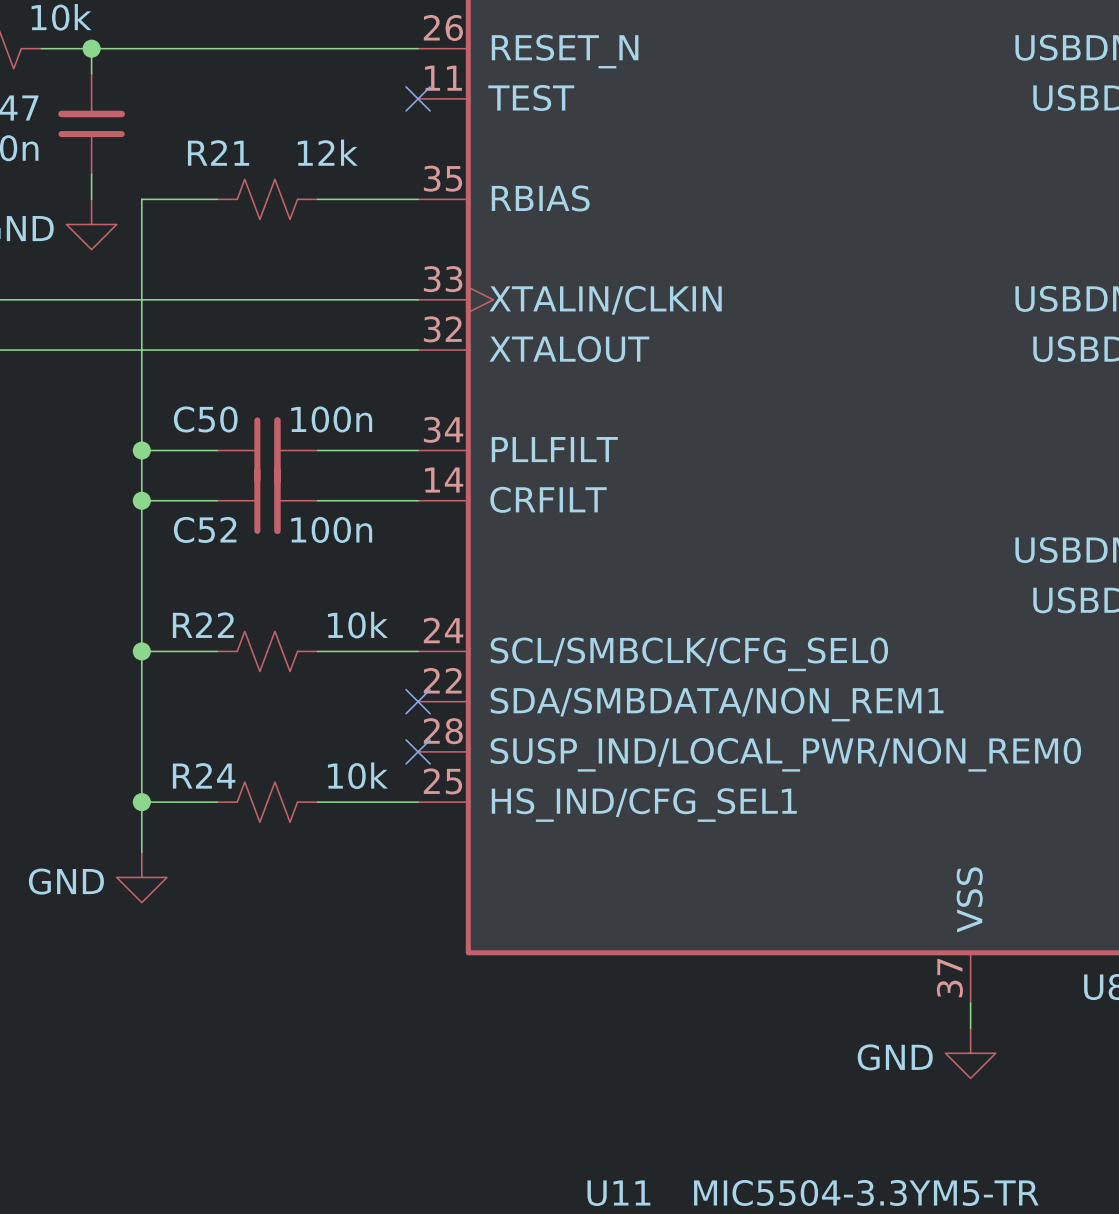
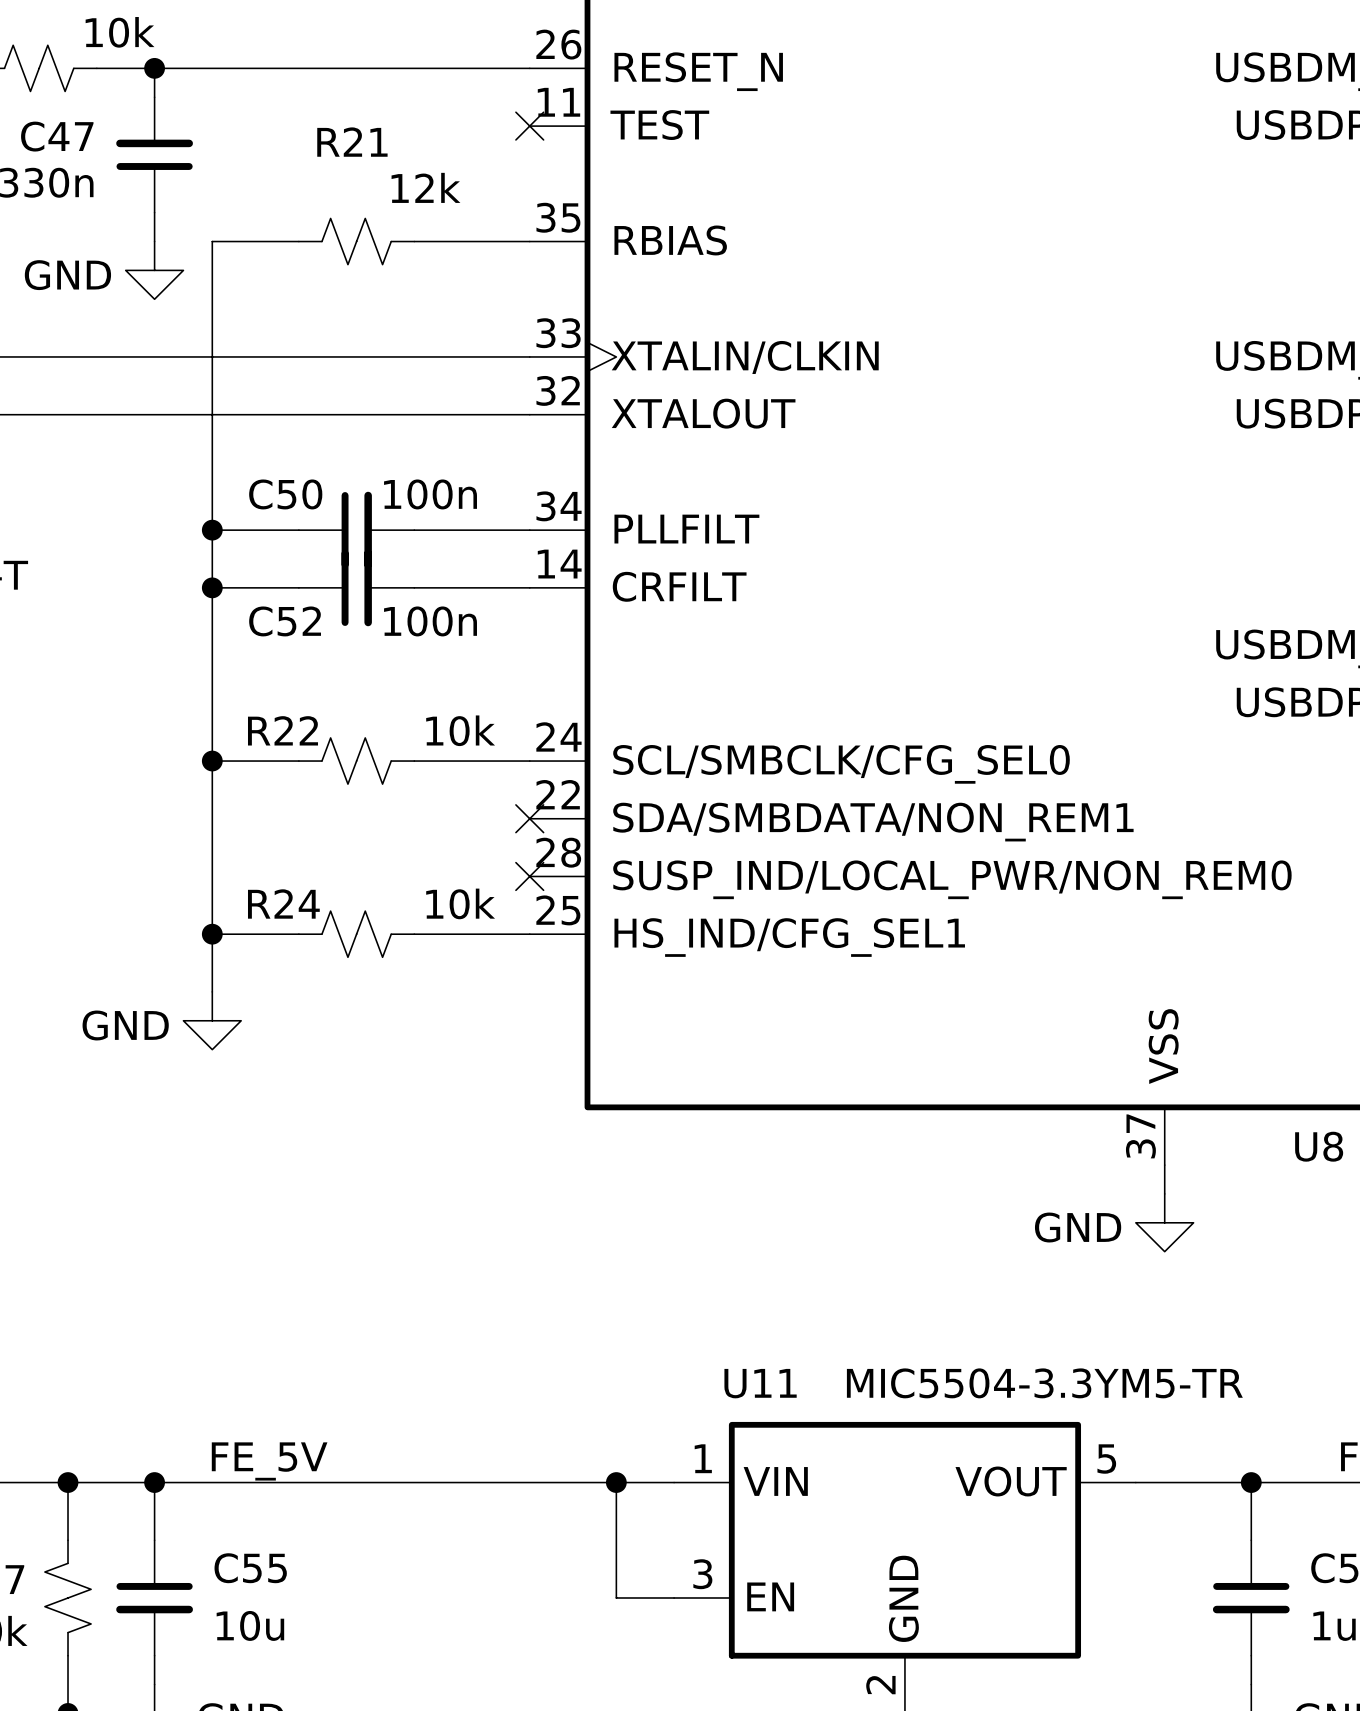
R21 name position: R21 (218, 152) -> R21 (352, 142)

